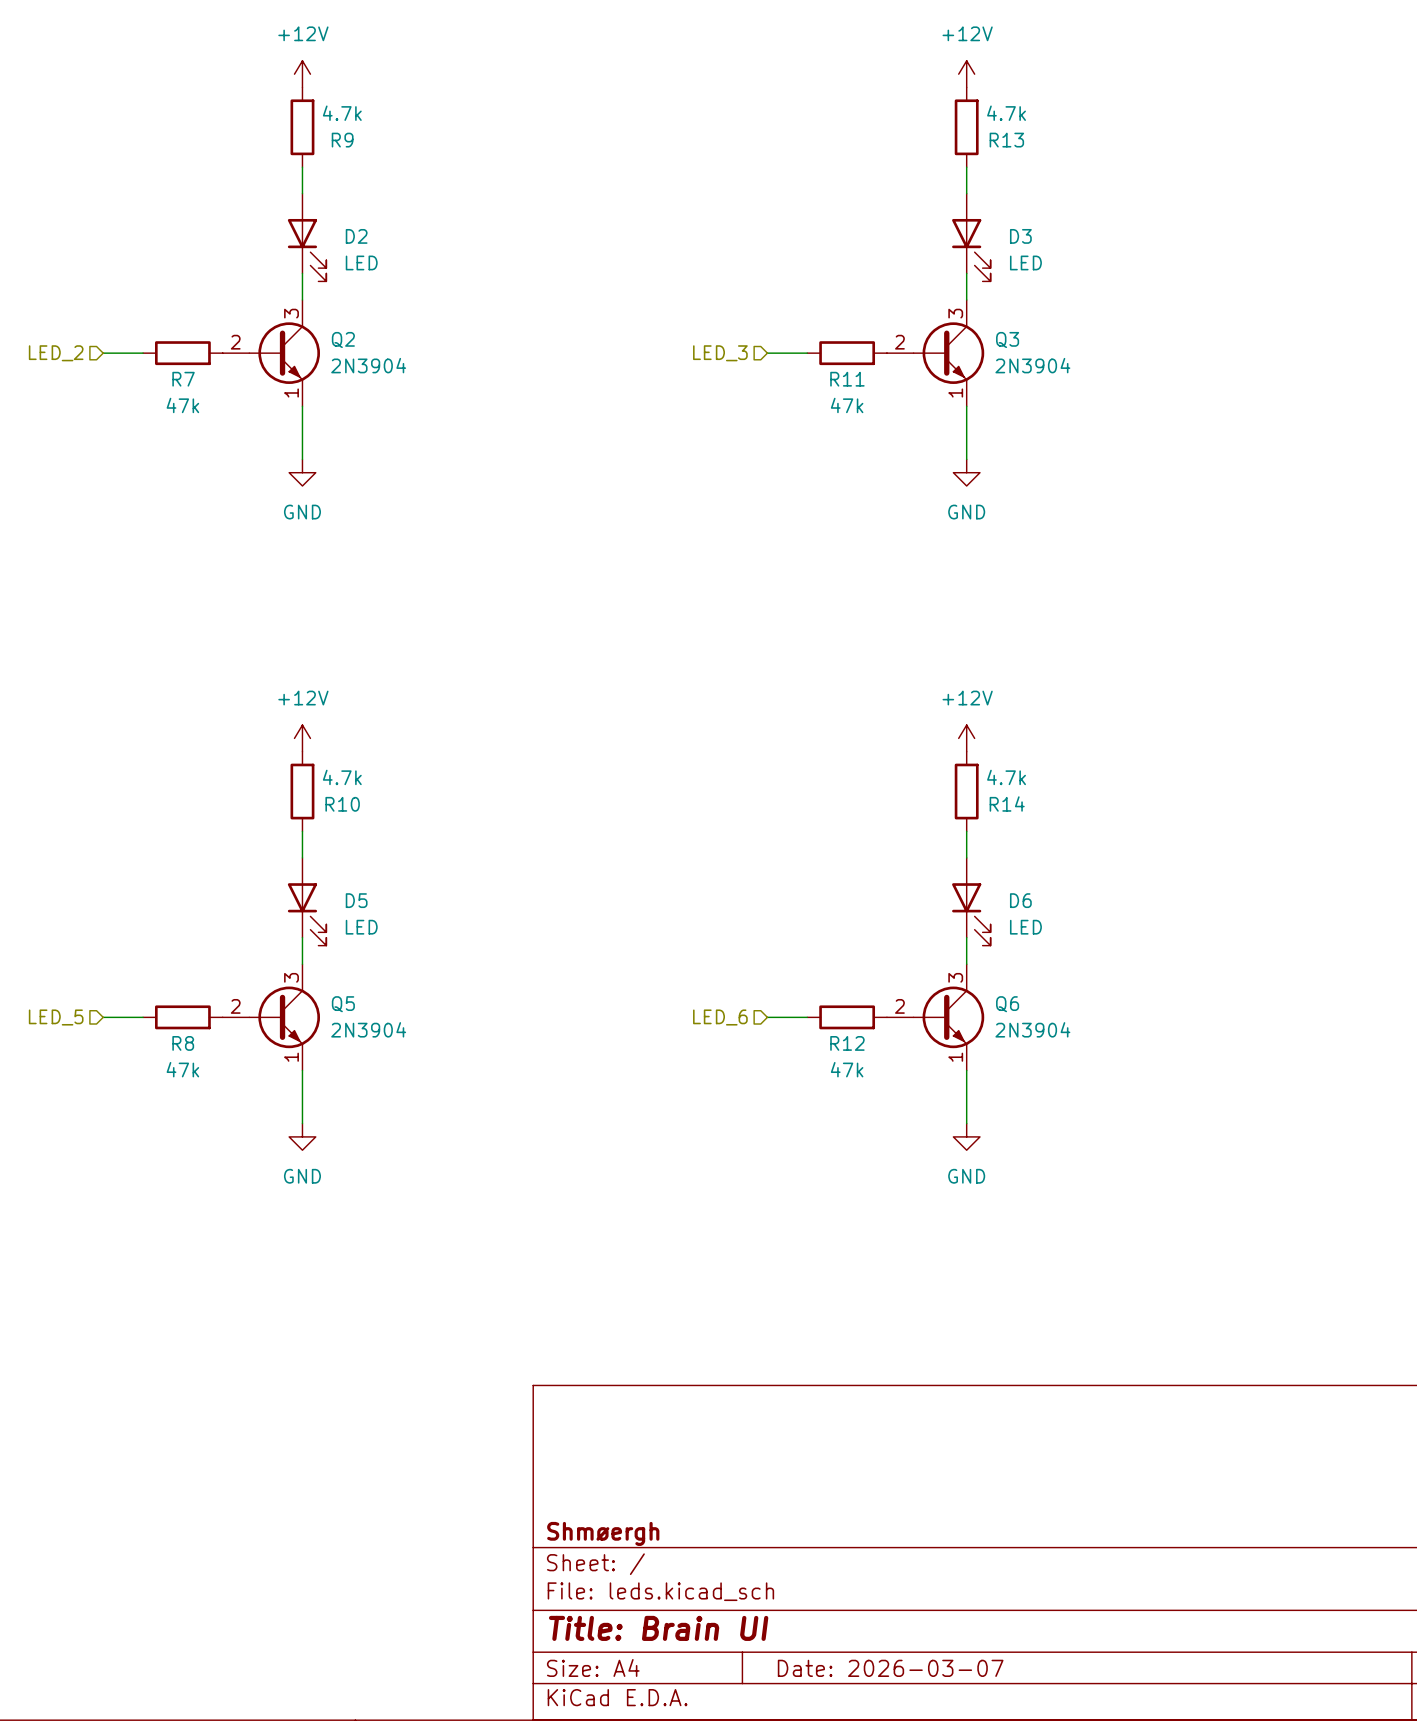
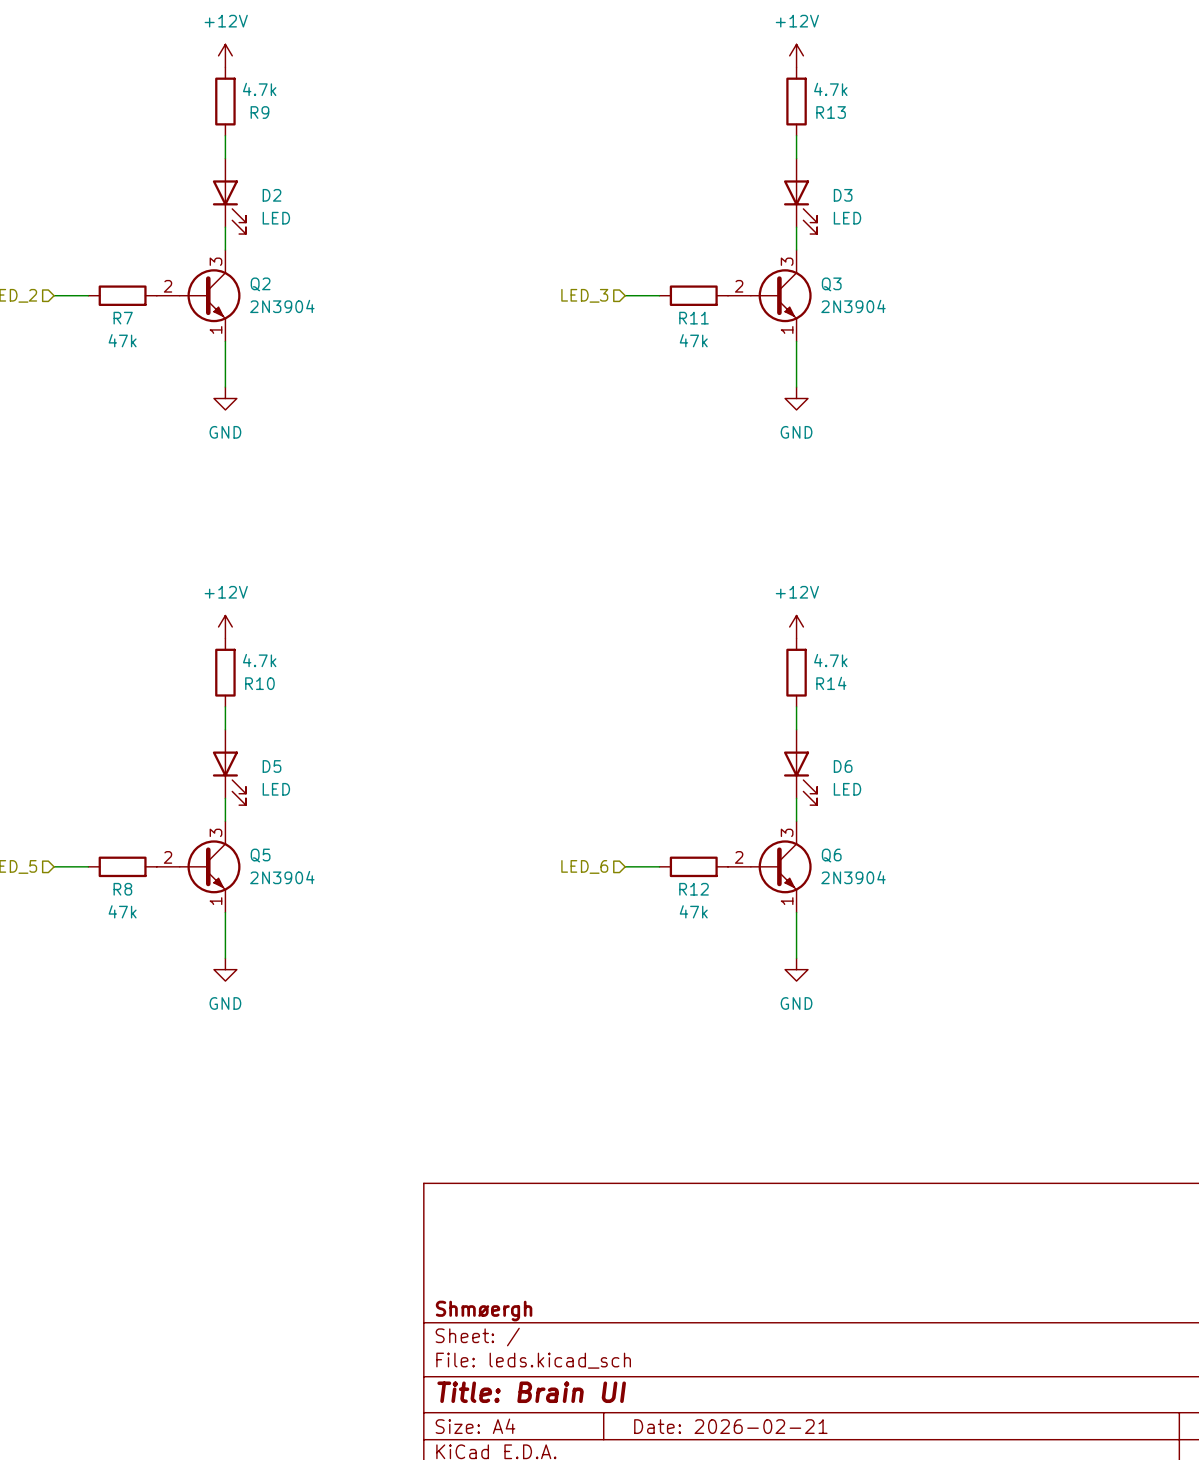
title block: Date: 2026-03-07 (890, 1668) -> Date: 2026-02-21 (730, 1426)

